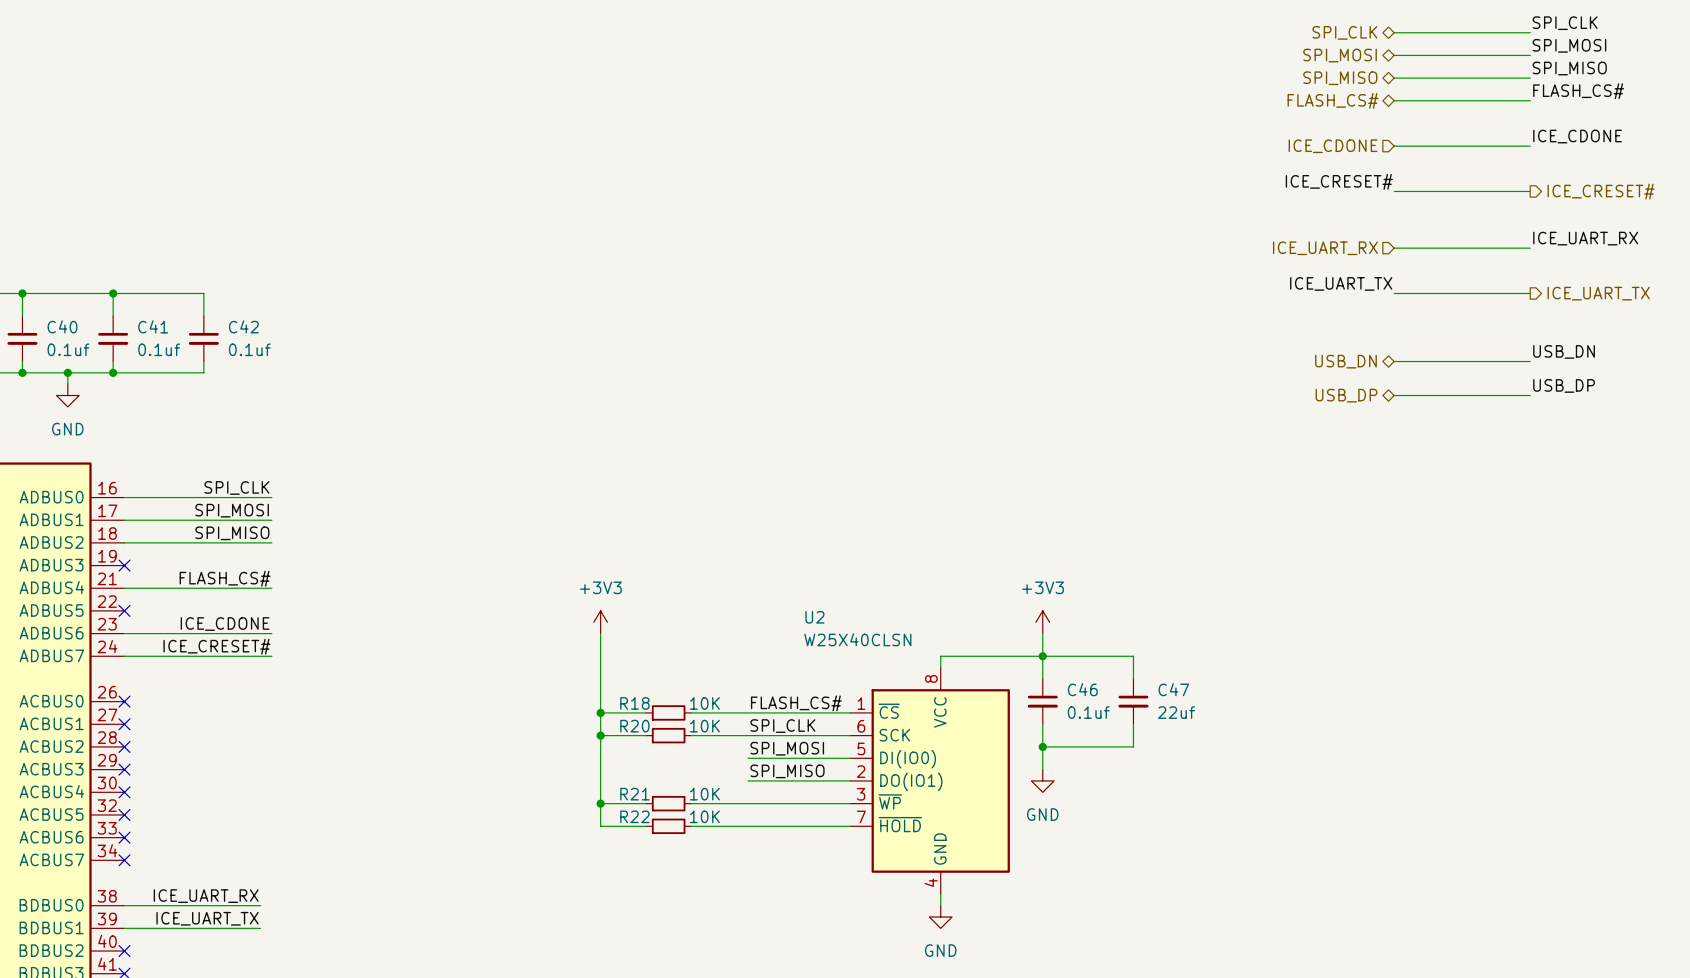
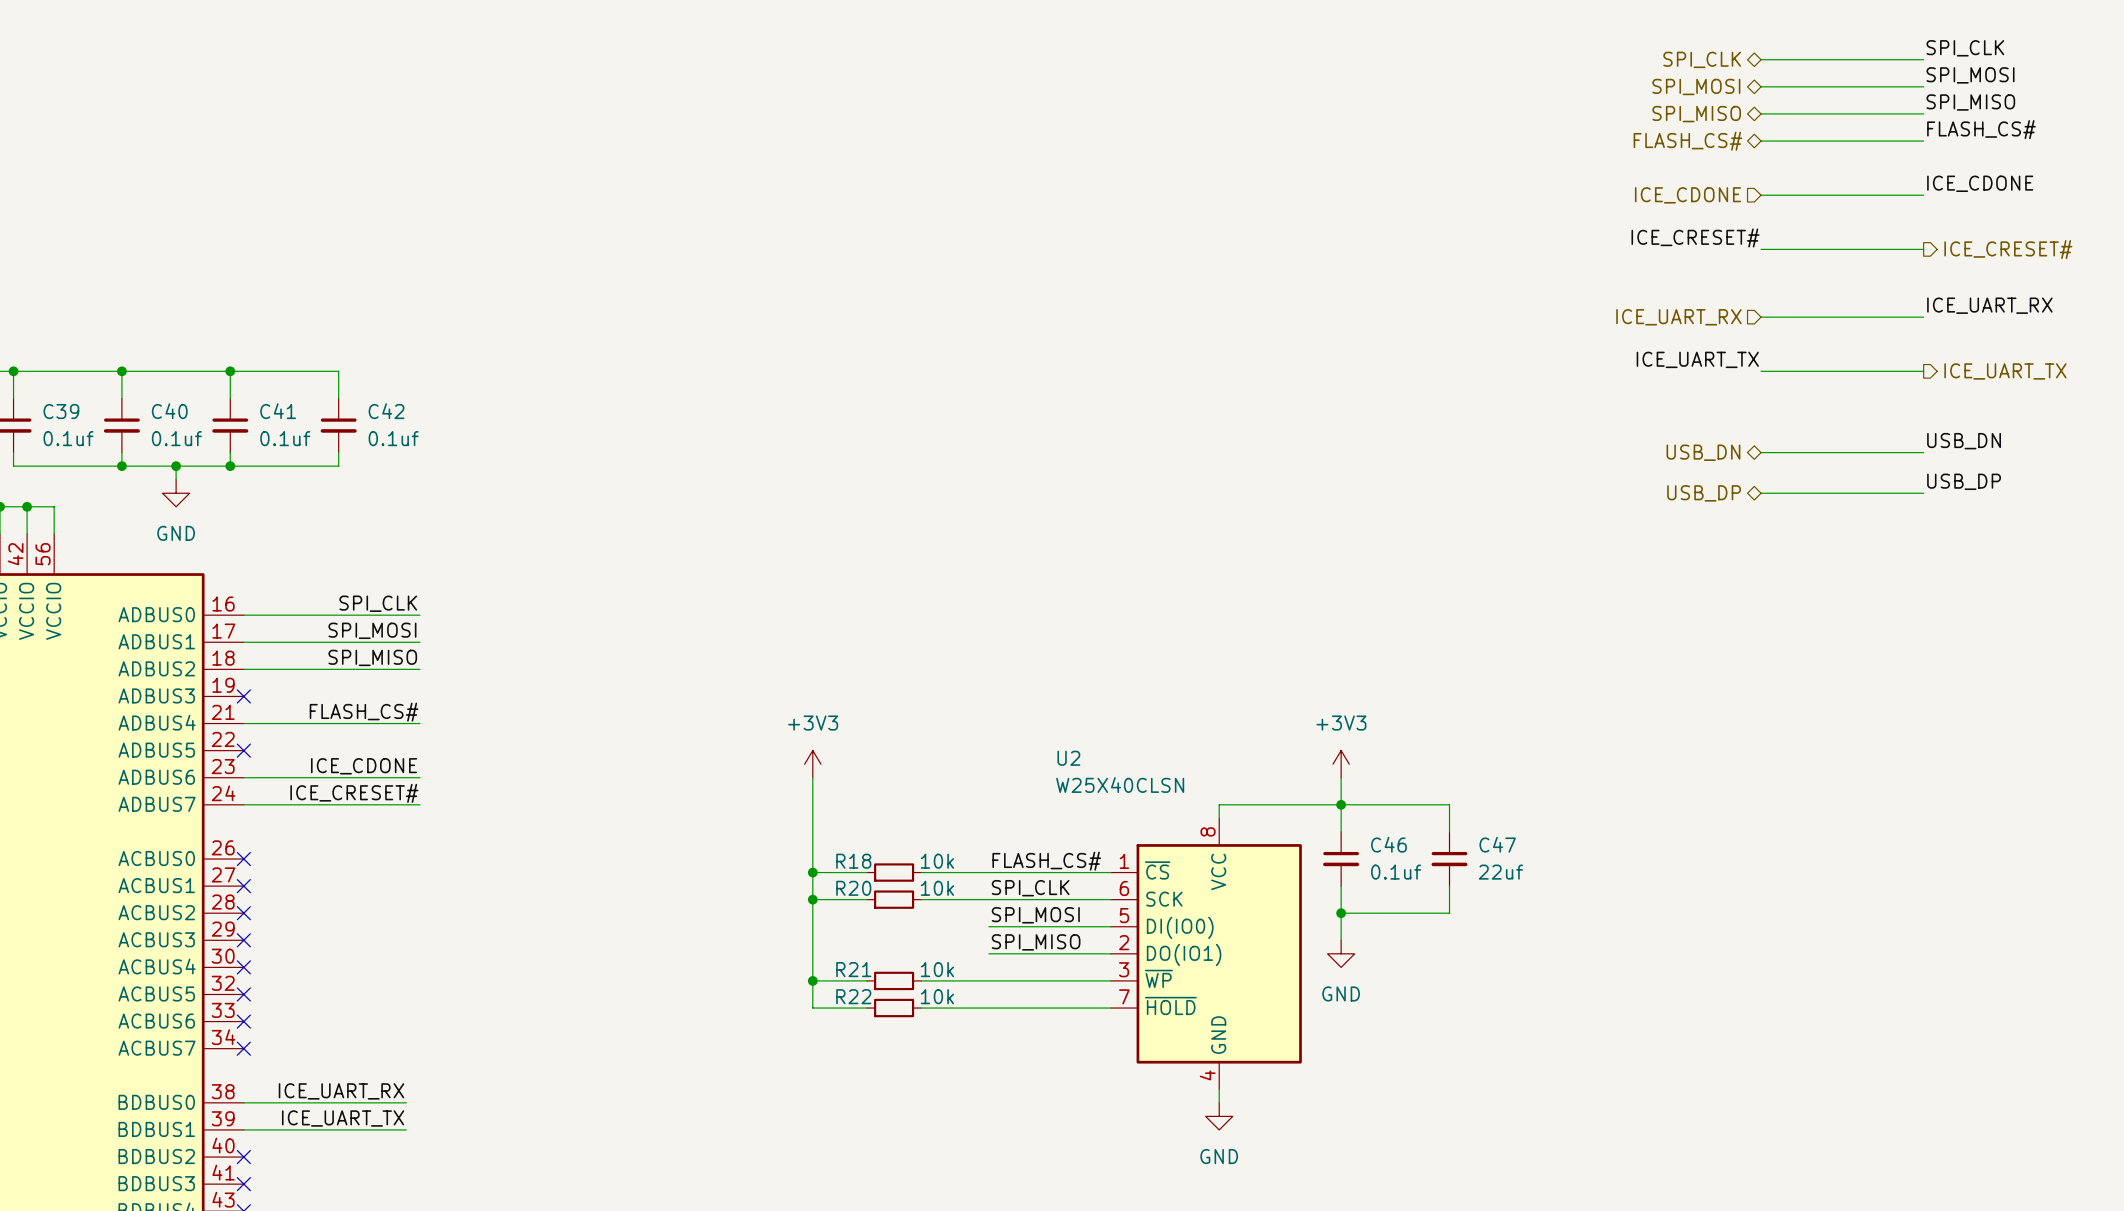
R18 value: 10K (704, 703) -> 10k (937, 861)
R20 value: 10K (704, 726) -> 10k (937, 888)
R21 value: 10K (704, 794) -> 10k (937, 969)
R22 value: 10K (704, 816) -> 10k (937, 996)

